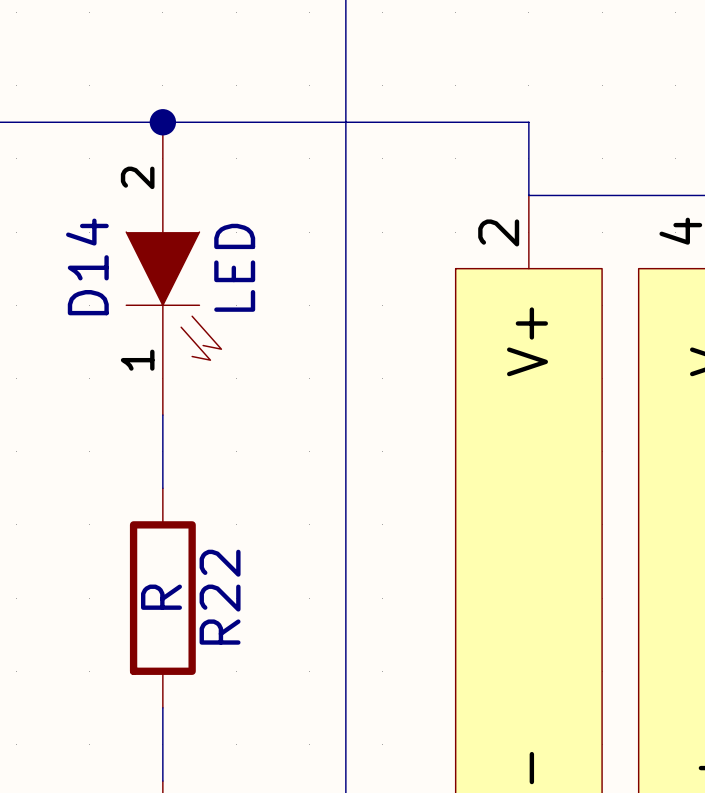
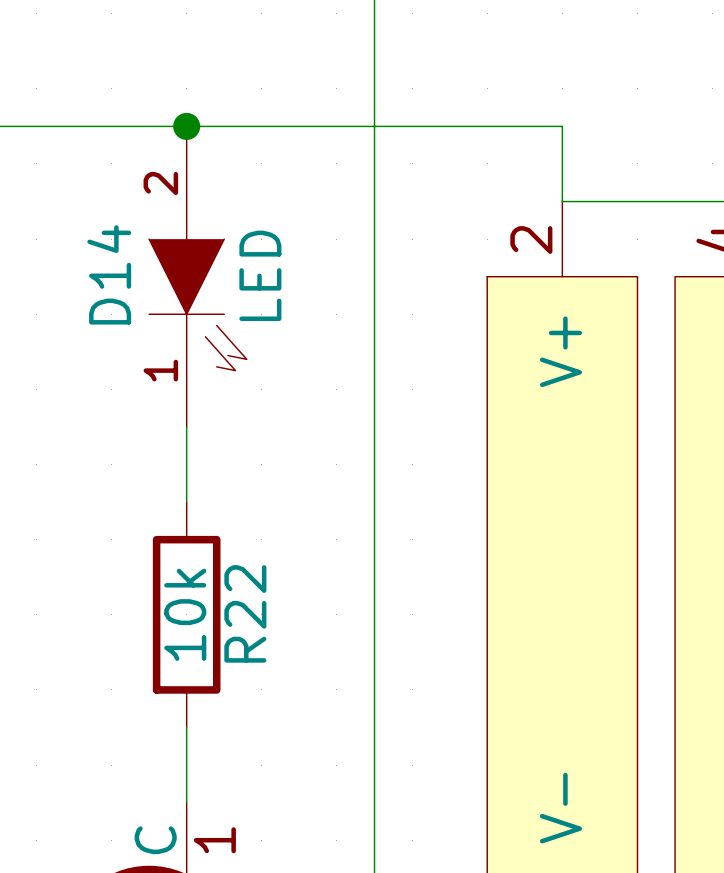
R22 value: R (161, 597) -> 10k (185, 614)

